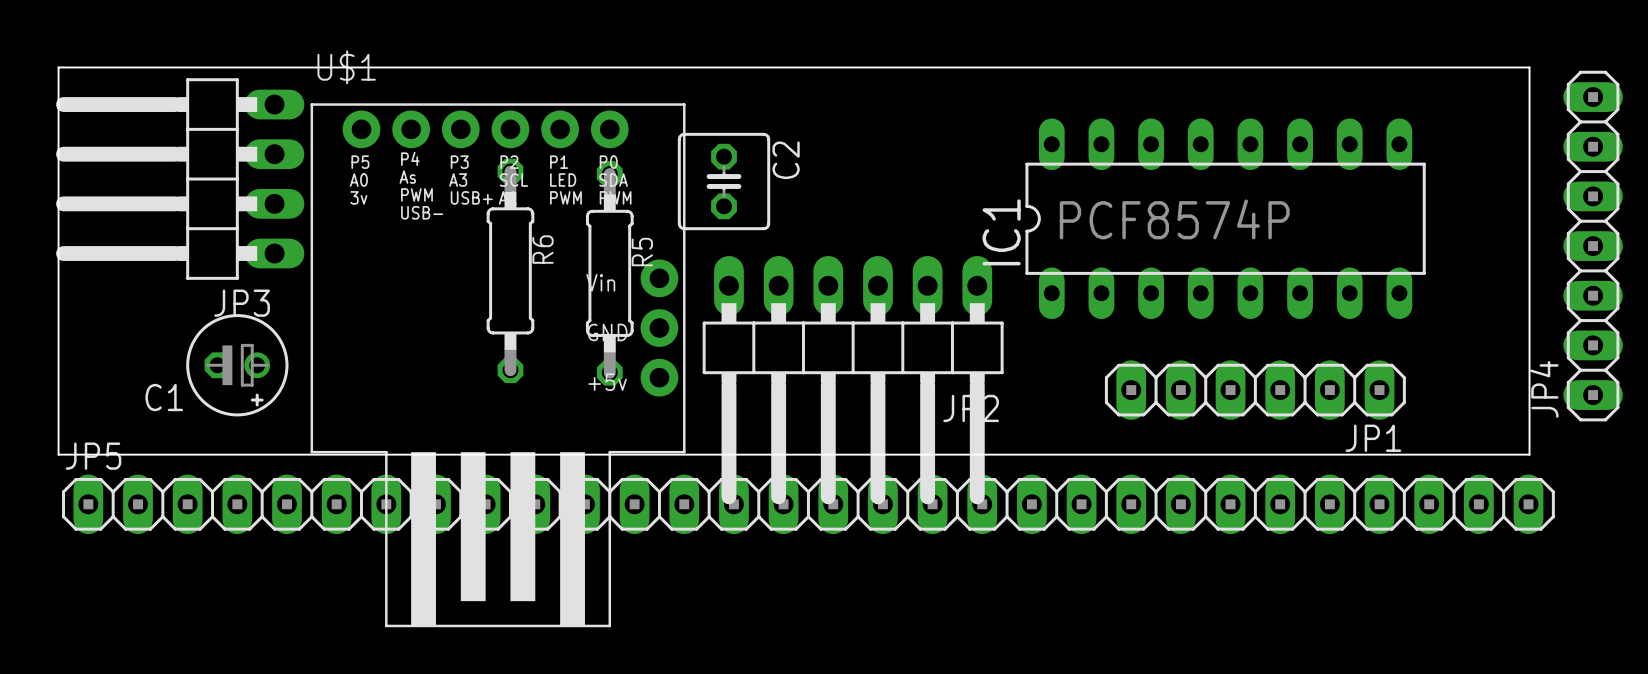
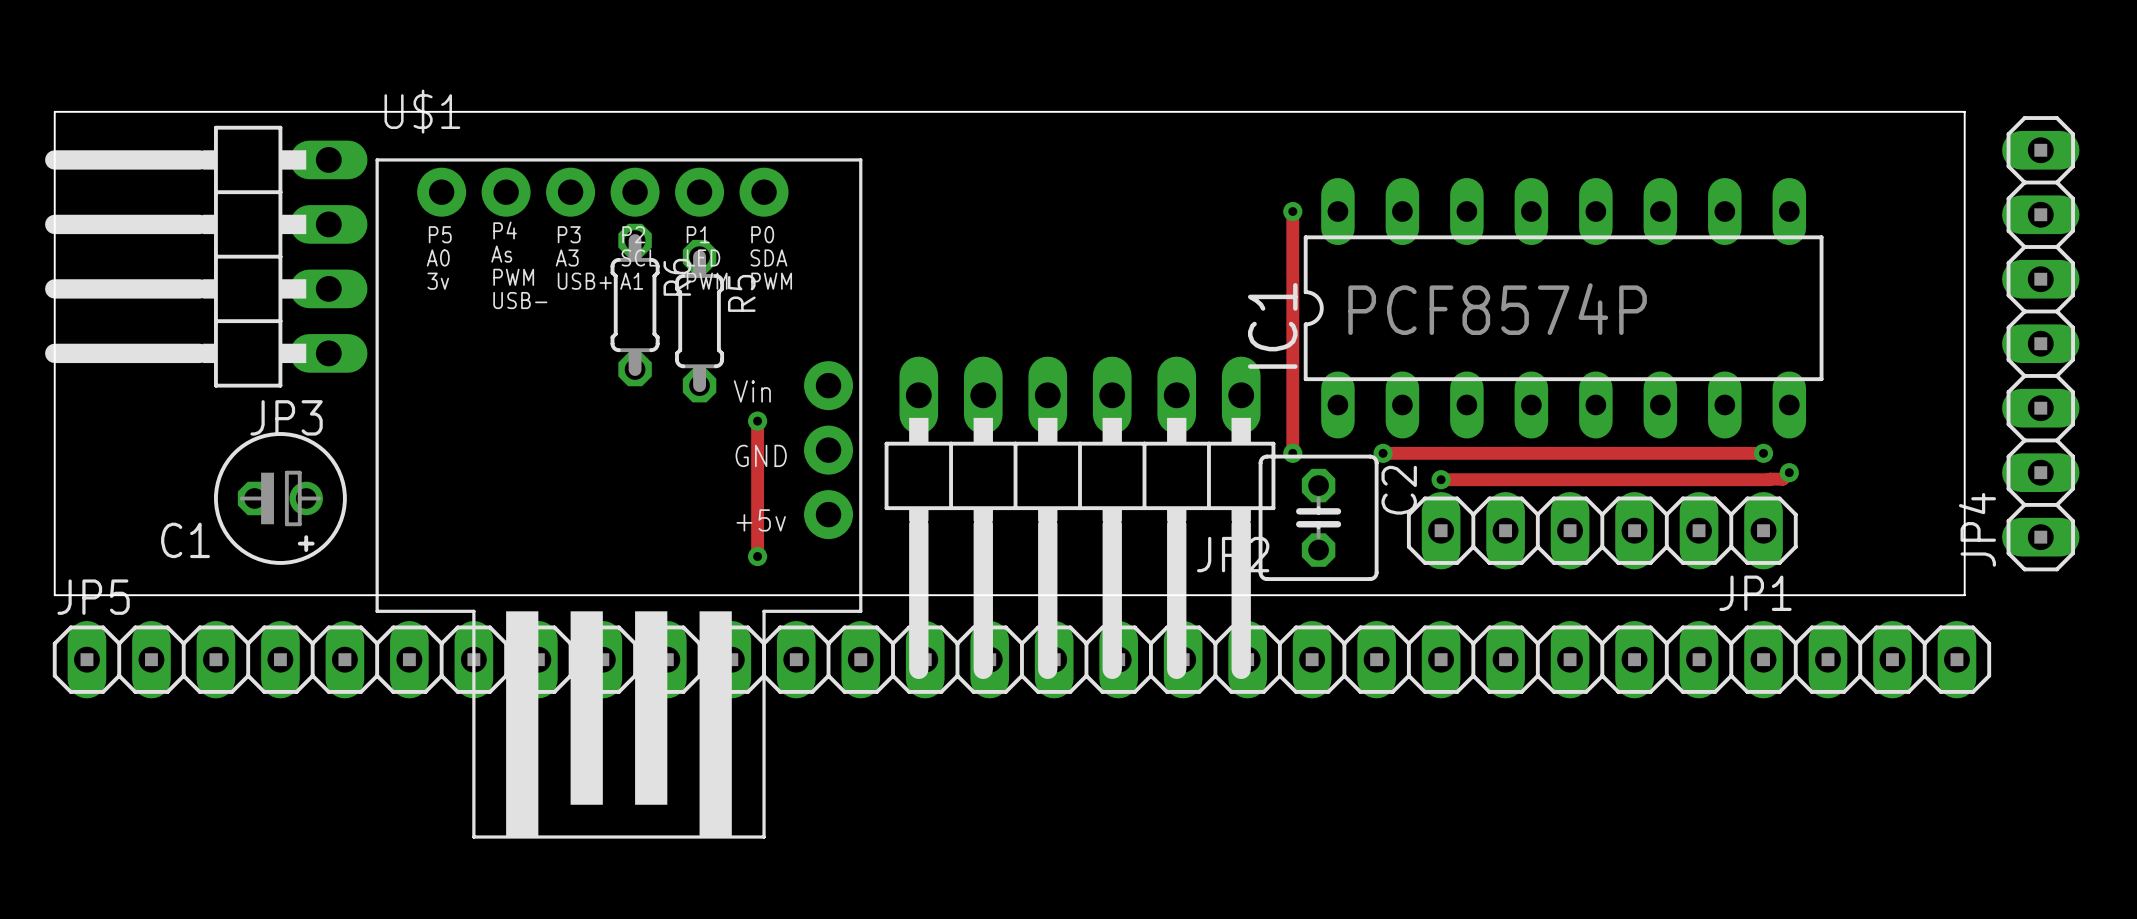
board edge: (63, 67) (58, 67) (58, 454) (1529, 454) (1529, 67) -> (54, 111) (54, 595) (1964, 595) (1964, 111) (1958, 111)
track: none -> (1292, 211) (1292, 453)
via: none -> (1292, 211)
R6 footprint: [486, 158, 535, 384] -> [610, 223, 660, 387]
R5 footprint: [585, 161, 634, 386] -> [675, 239, 725, 403]
C2 position: (724, 181) -> (1318, 517)
track: none -> (757, 421) (757, 556)
via: none -> (757, 421)
via: none -> (1292, 453)
track: none -> (1383, 453) (1763, 453)
via: none -> (1383, 453)
via: none -> (1763, 453)
track: none -> (1789, 472) (1782, 479) (1769, 479) (1441, 479)
via: none -> (1789, 472)
via: none -> (1441, 479)
via: none -> (757, 556)
JP5 position: (808, 504) -> (1021, 659)

